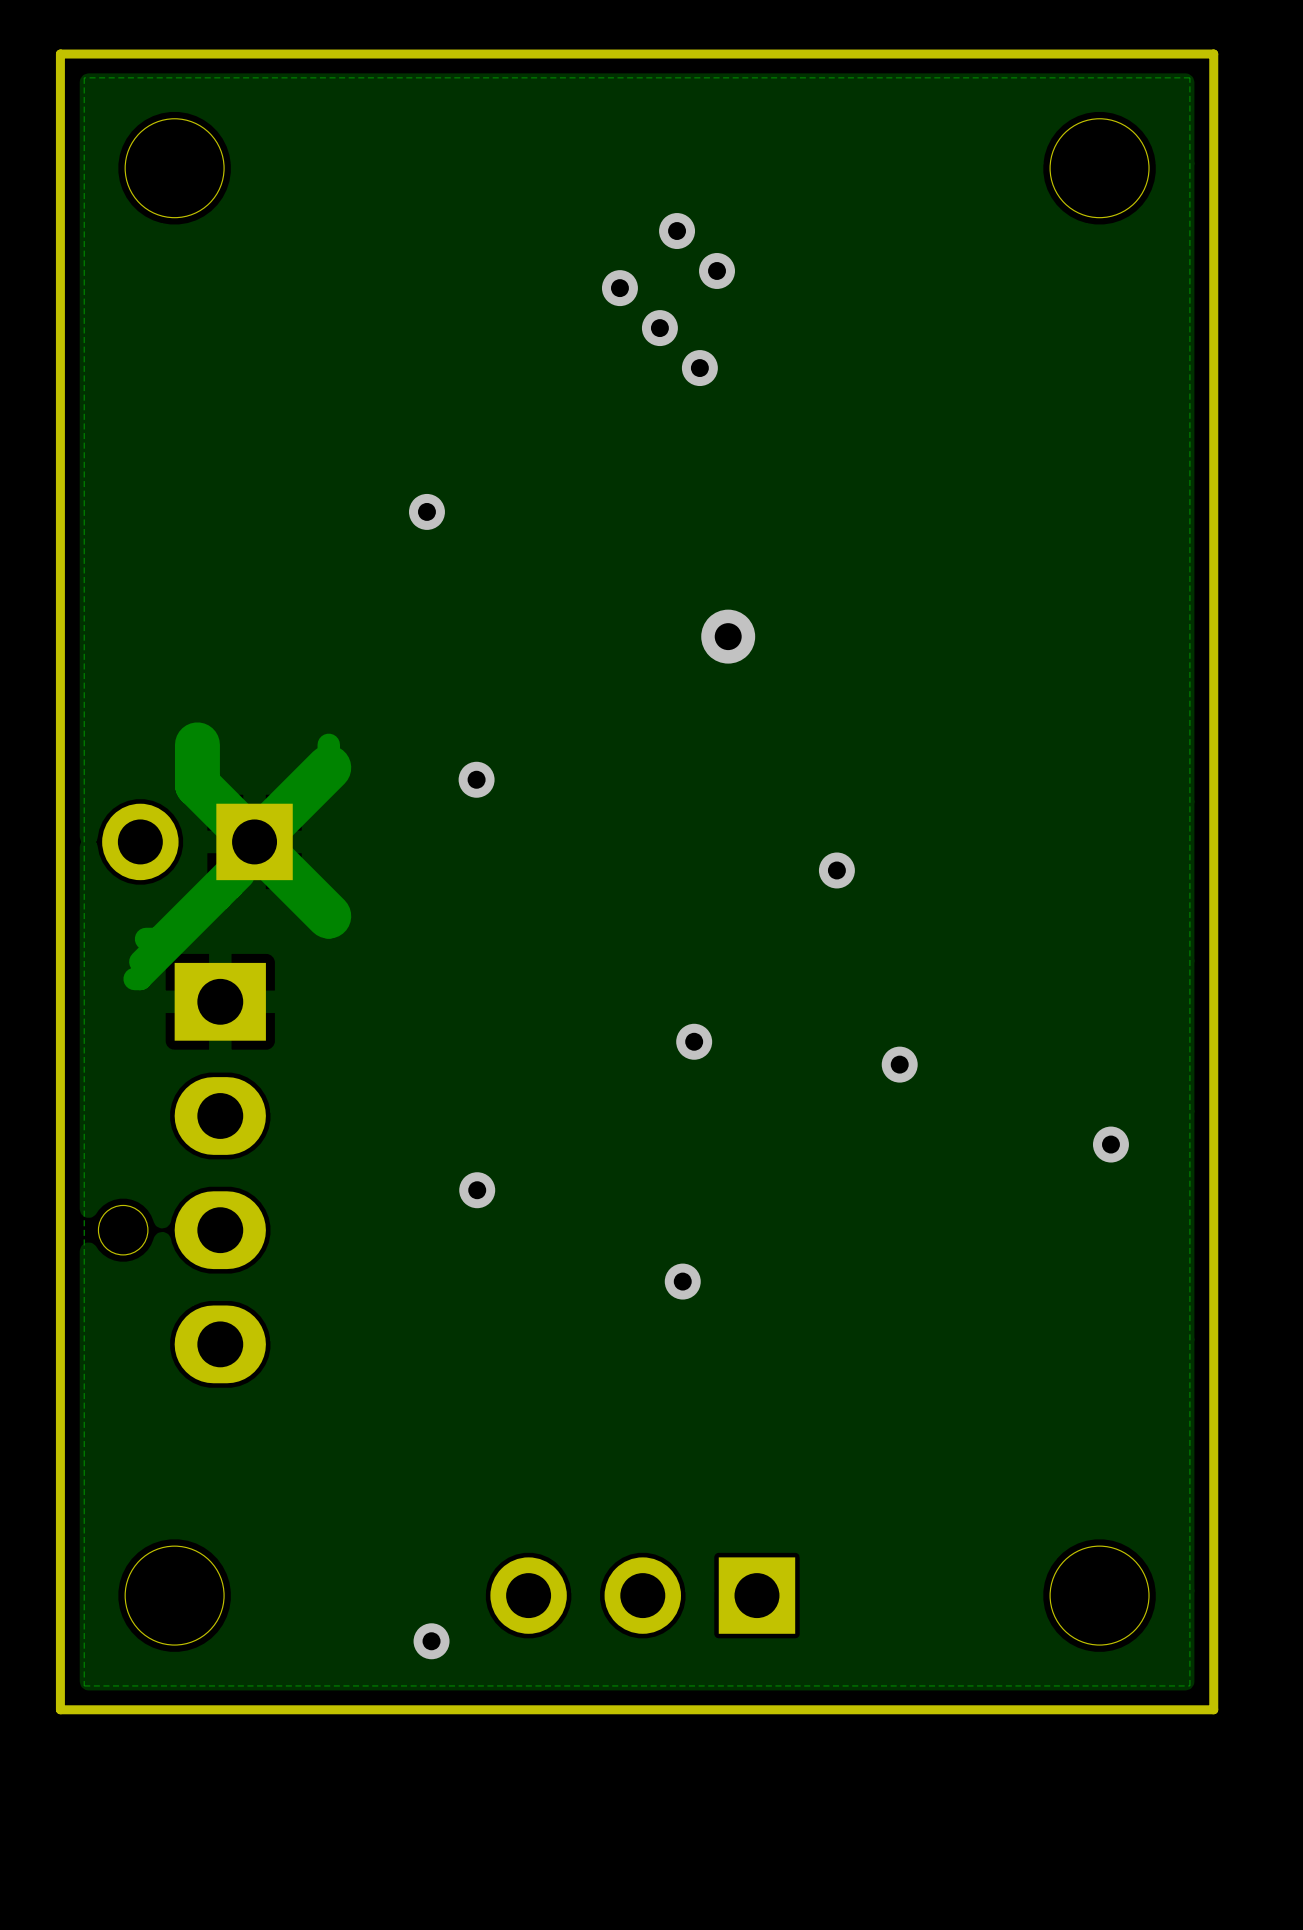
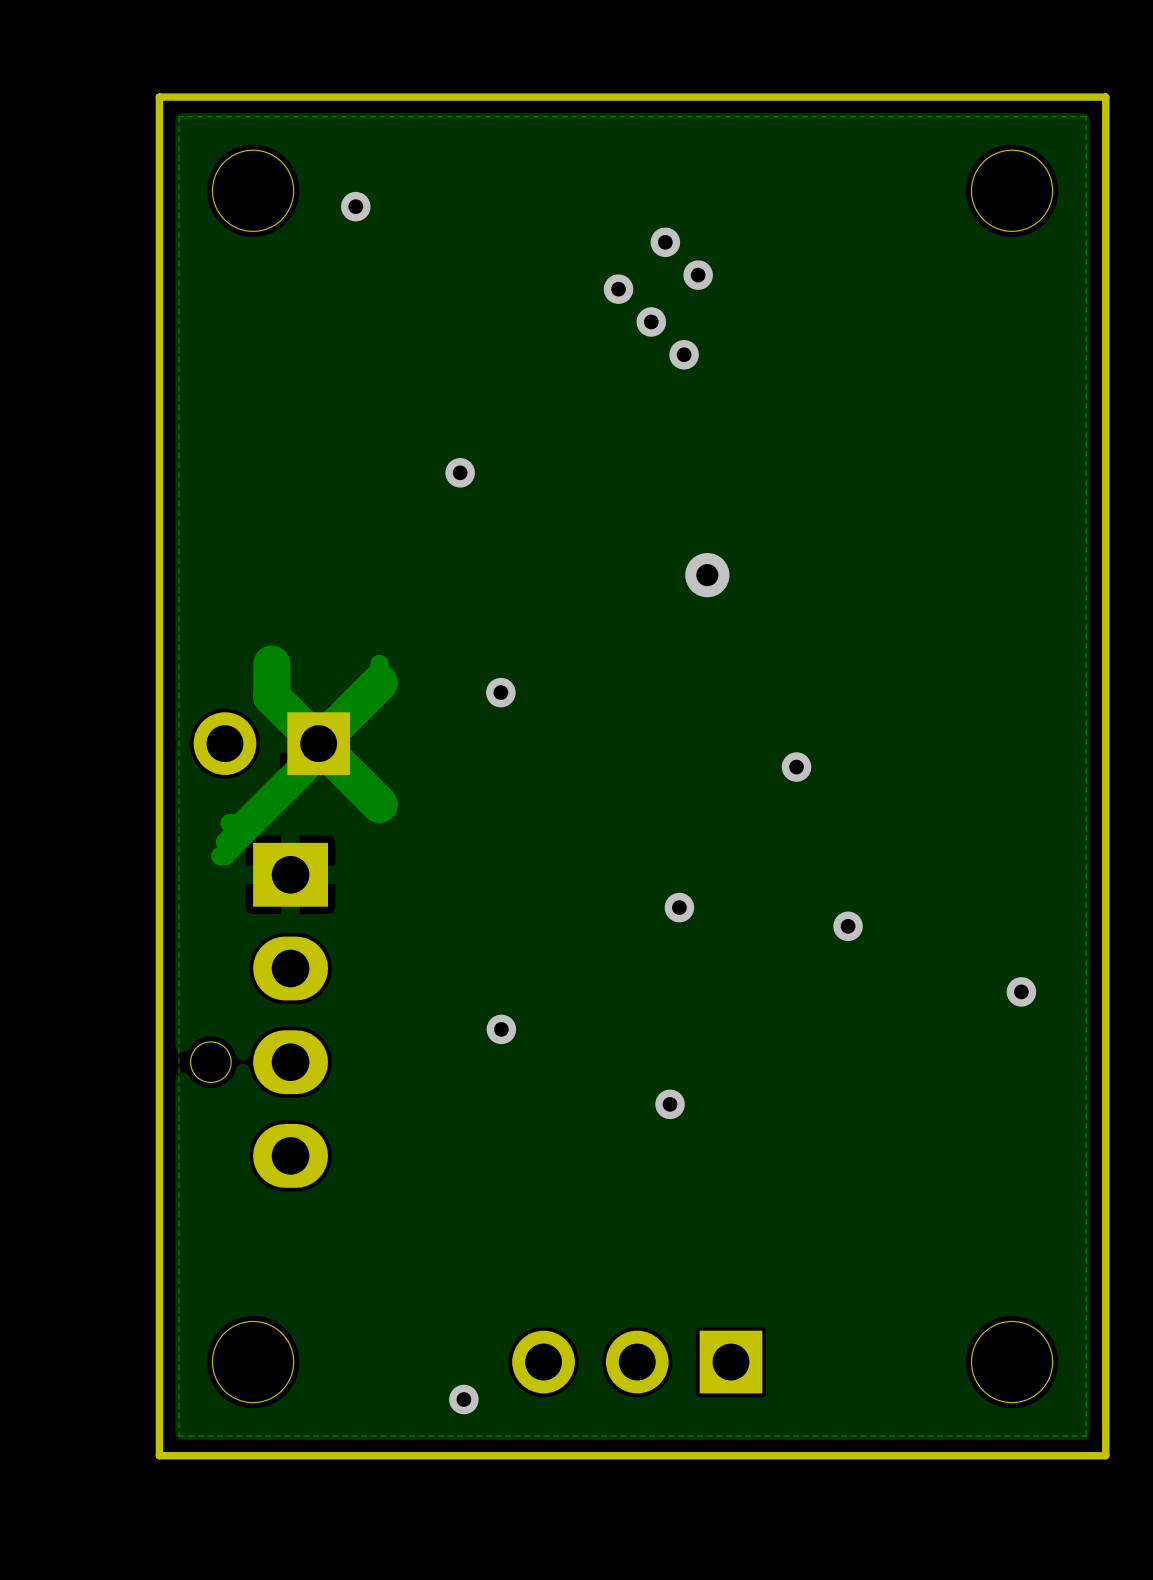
via: none -> (355, 206)

